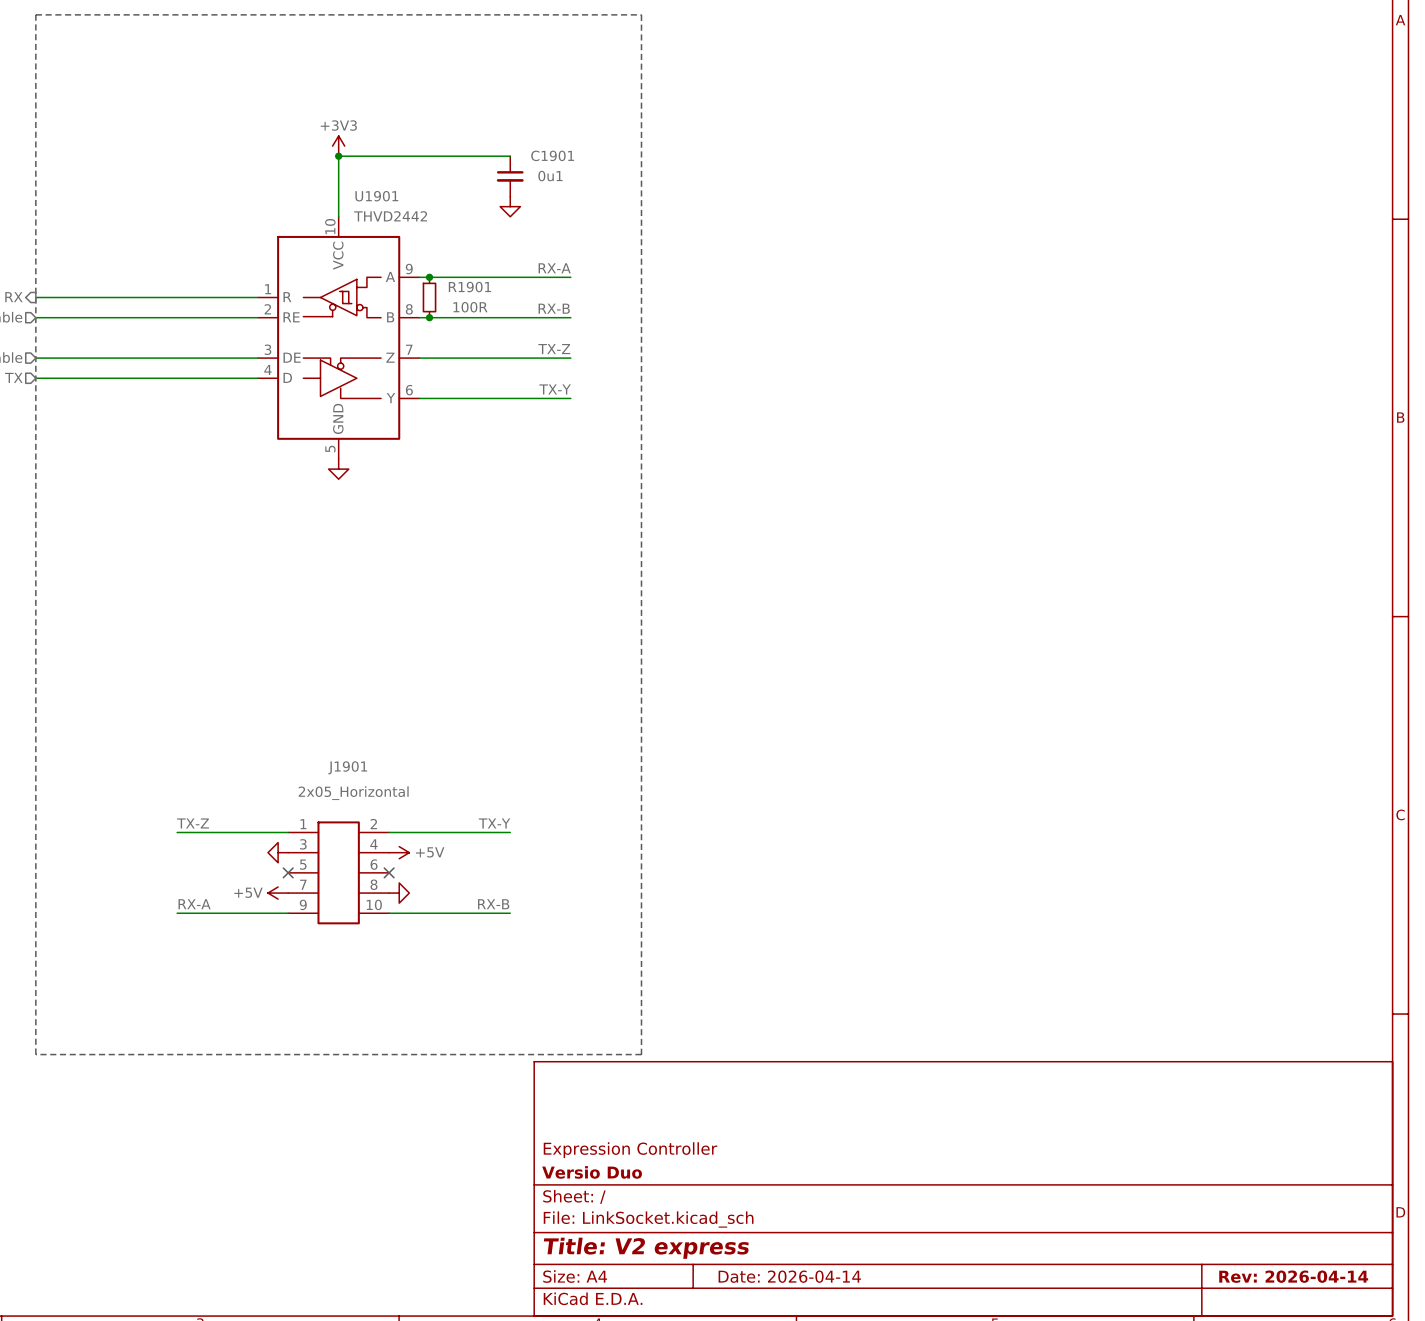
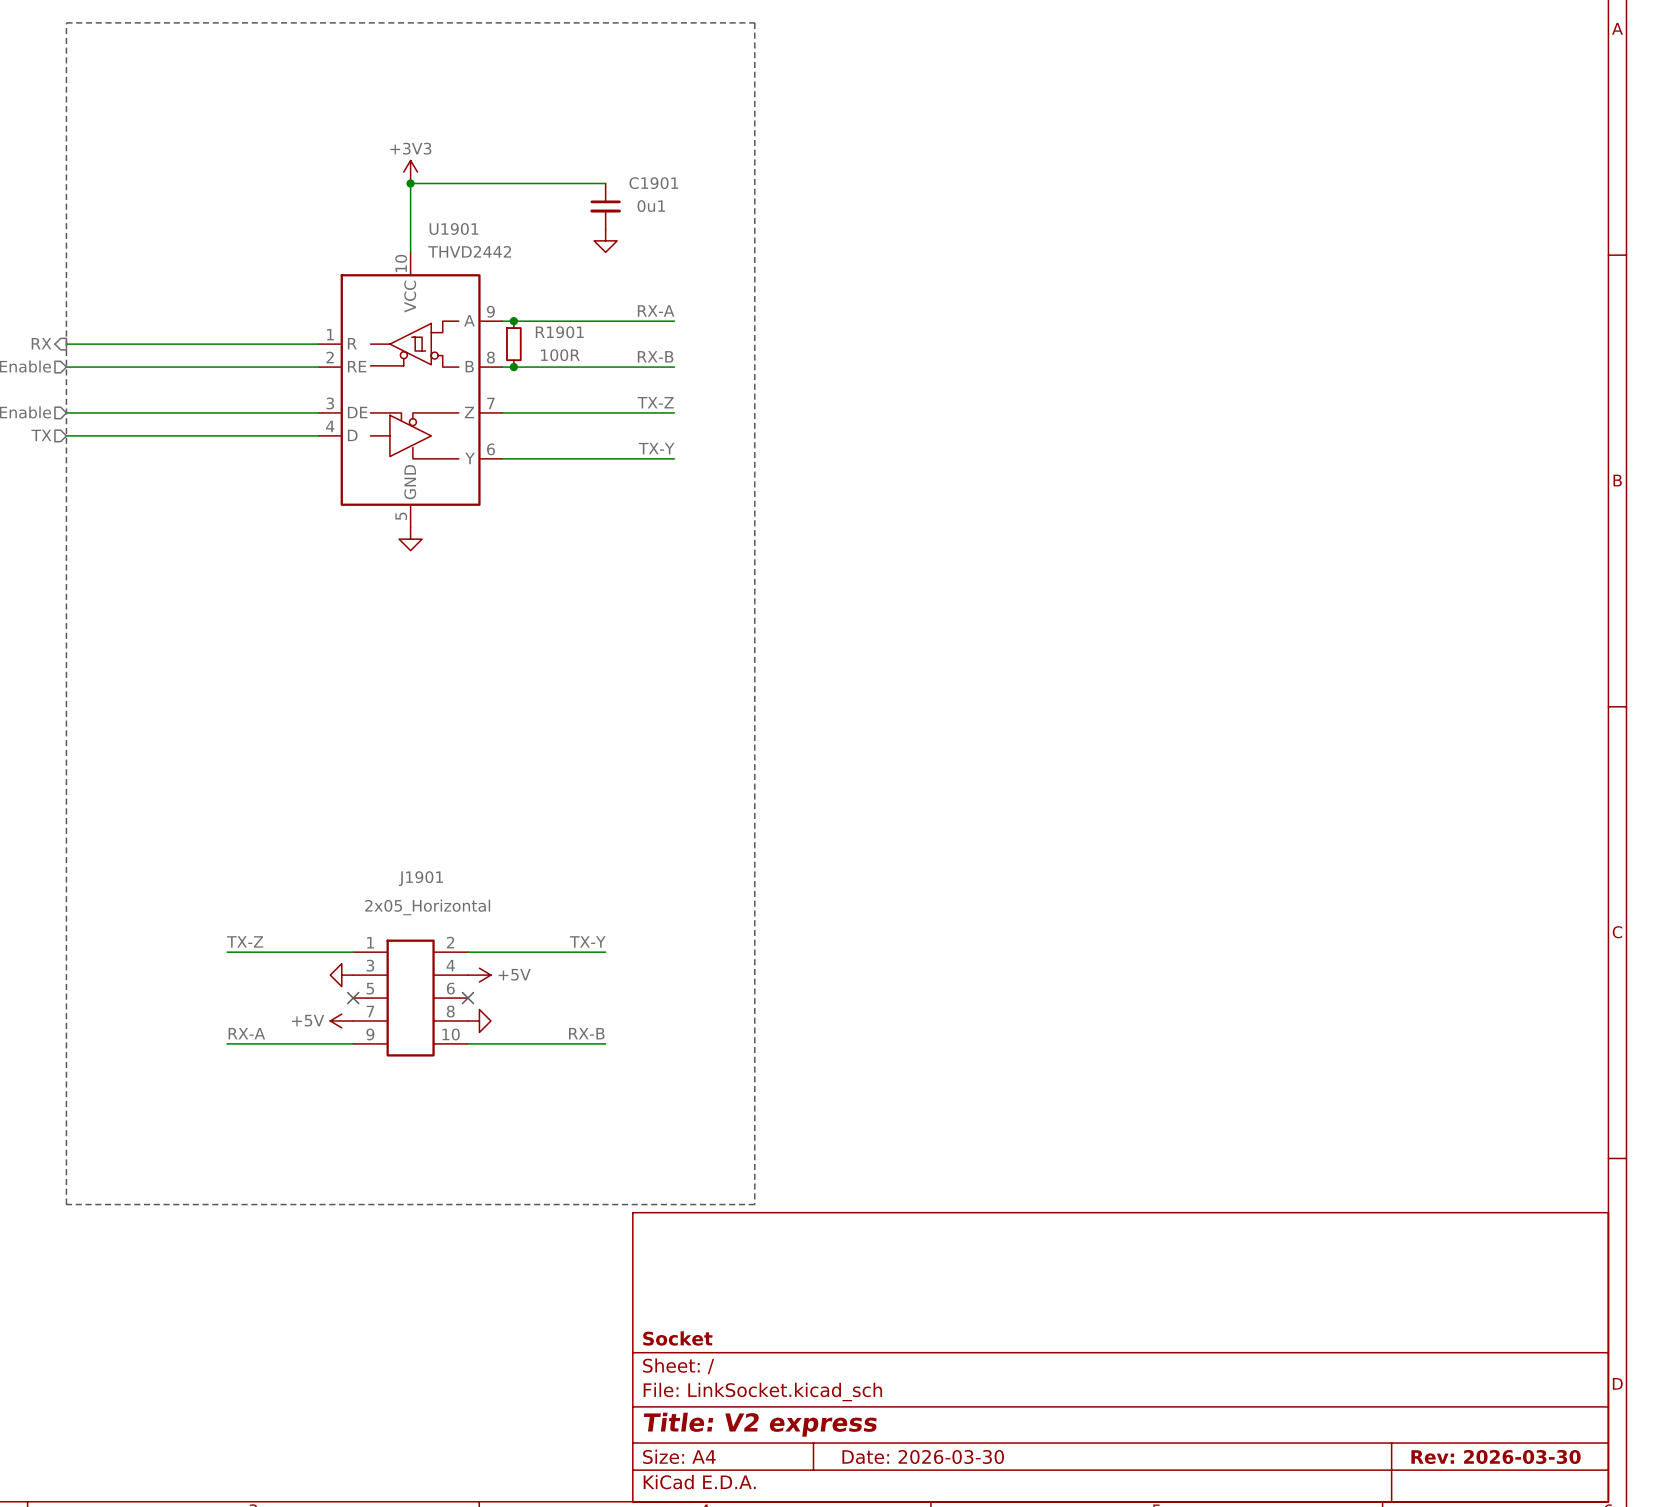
title block: Expression Controller (630, 1150) -> none
title block: Versio Duo (592, 1172) -> Socket (677, 1338)
title block: Date: 2026-04-14 (789, 1276) -> Date: 2026-03-30 (923, 1456)
title block: Rev: 2026-04-14 (1293, 1276) -> Rev: 2026-03-30 (1496, 1456)

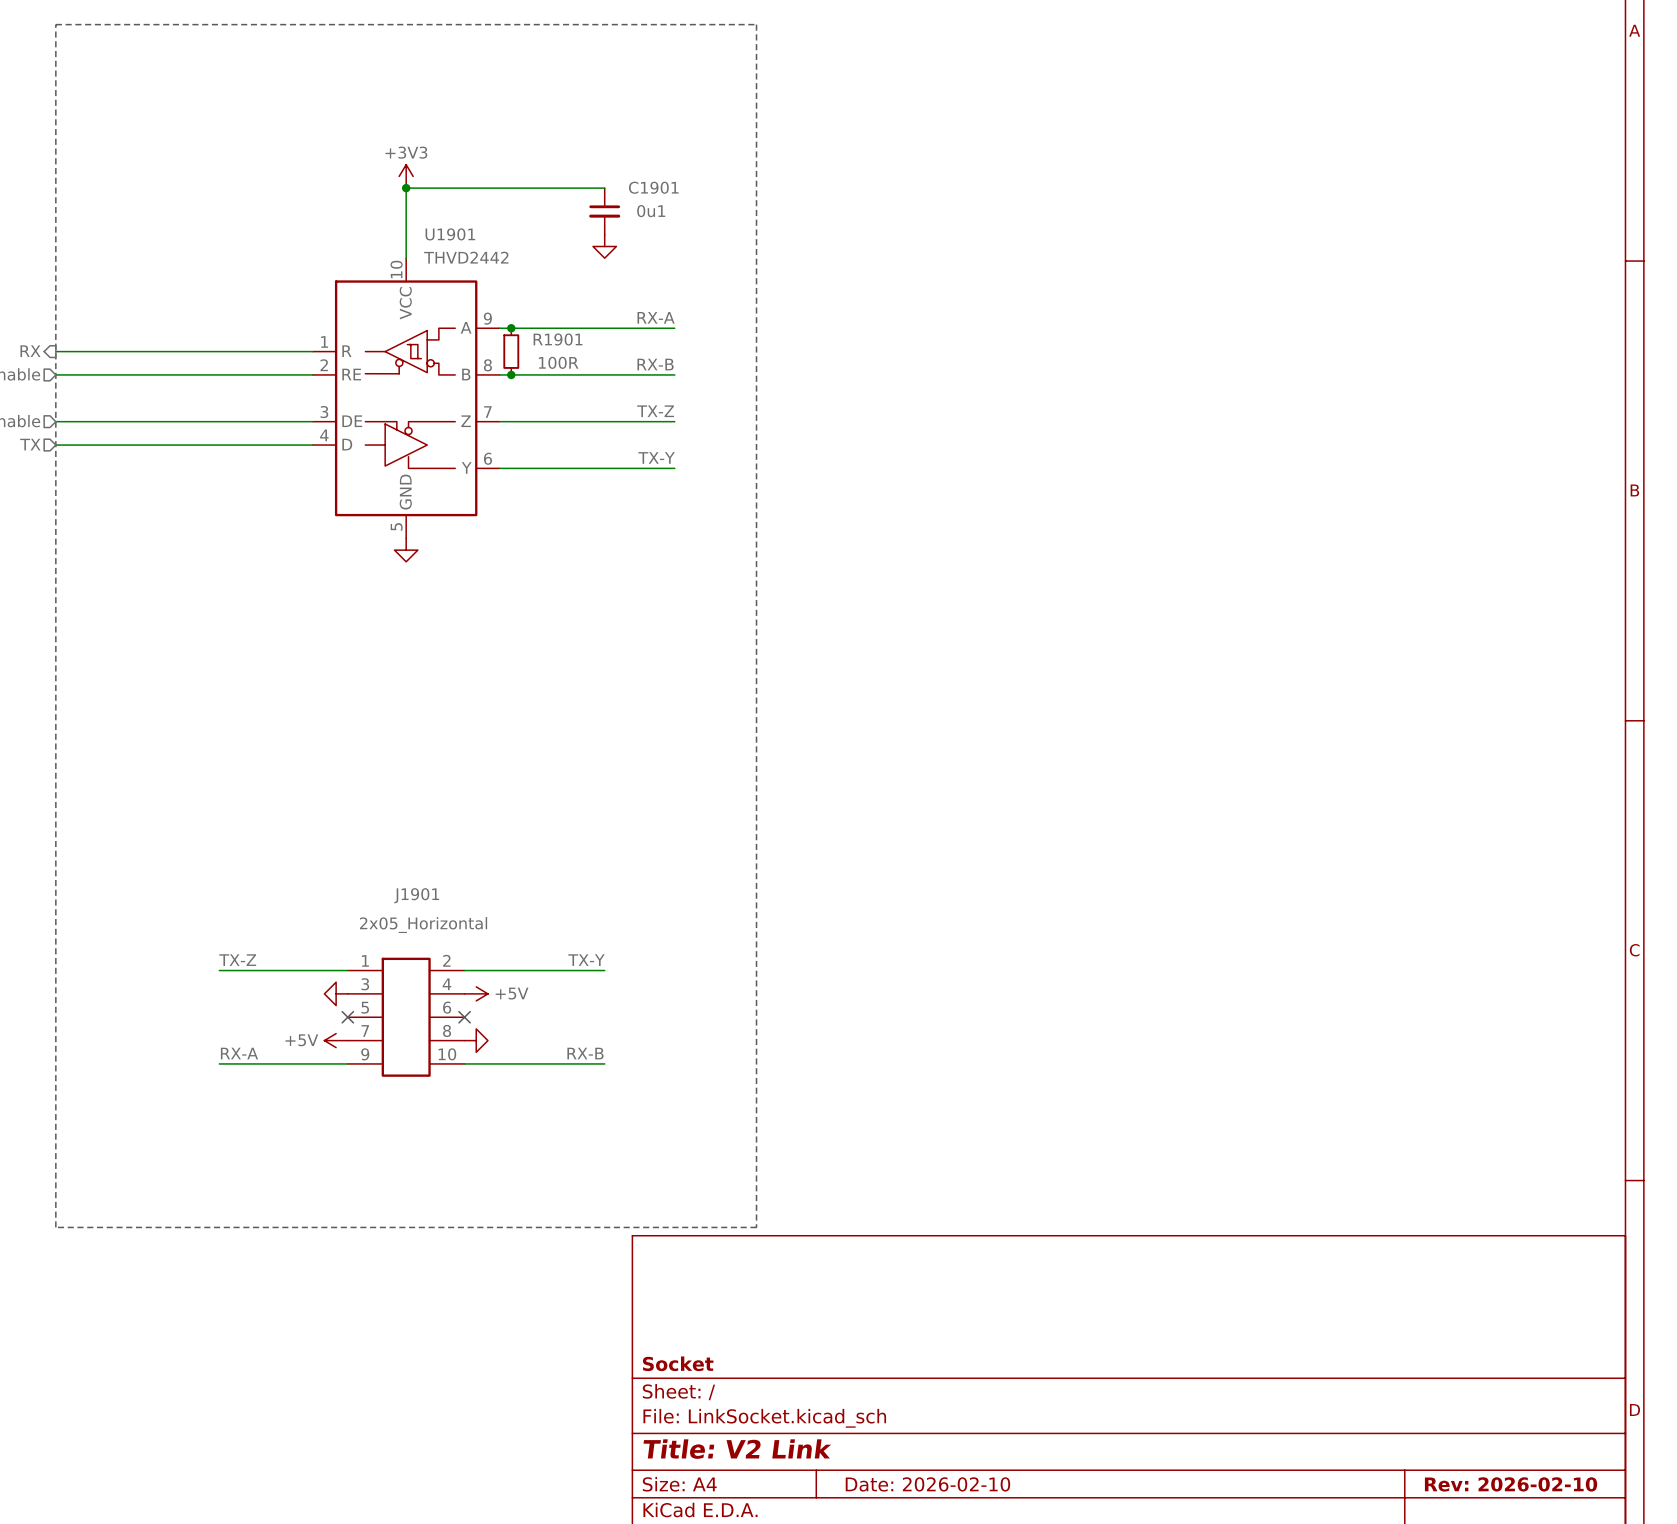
title block: Title: V2 express (760, 1424) -> Title: V2 Link (737, 1449)
title block: Date: 2026-03-30 (923, 1456) -> Date: 2026-02-10 (927, 1484)
title block: Rev: 2026-03-30 (1496, 1456) -> Rev: 2026-02-10 (1511, 1484)

